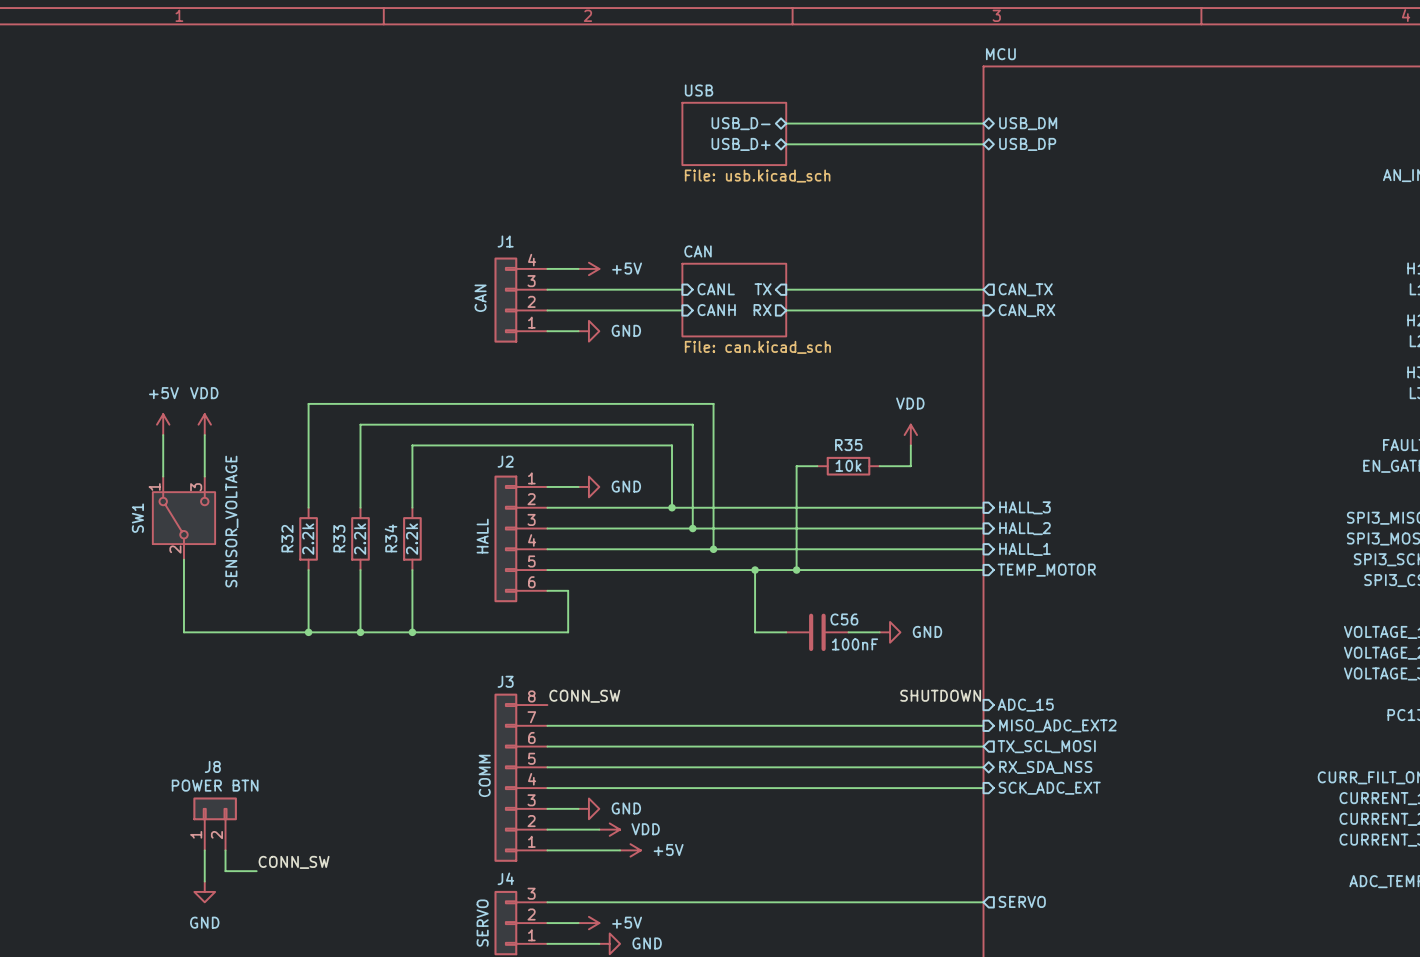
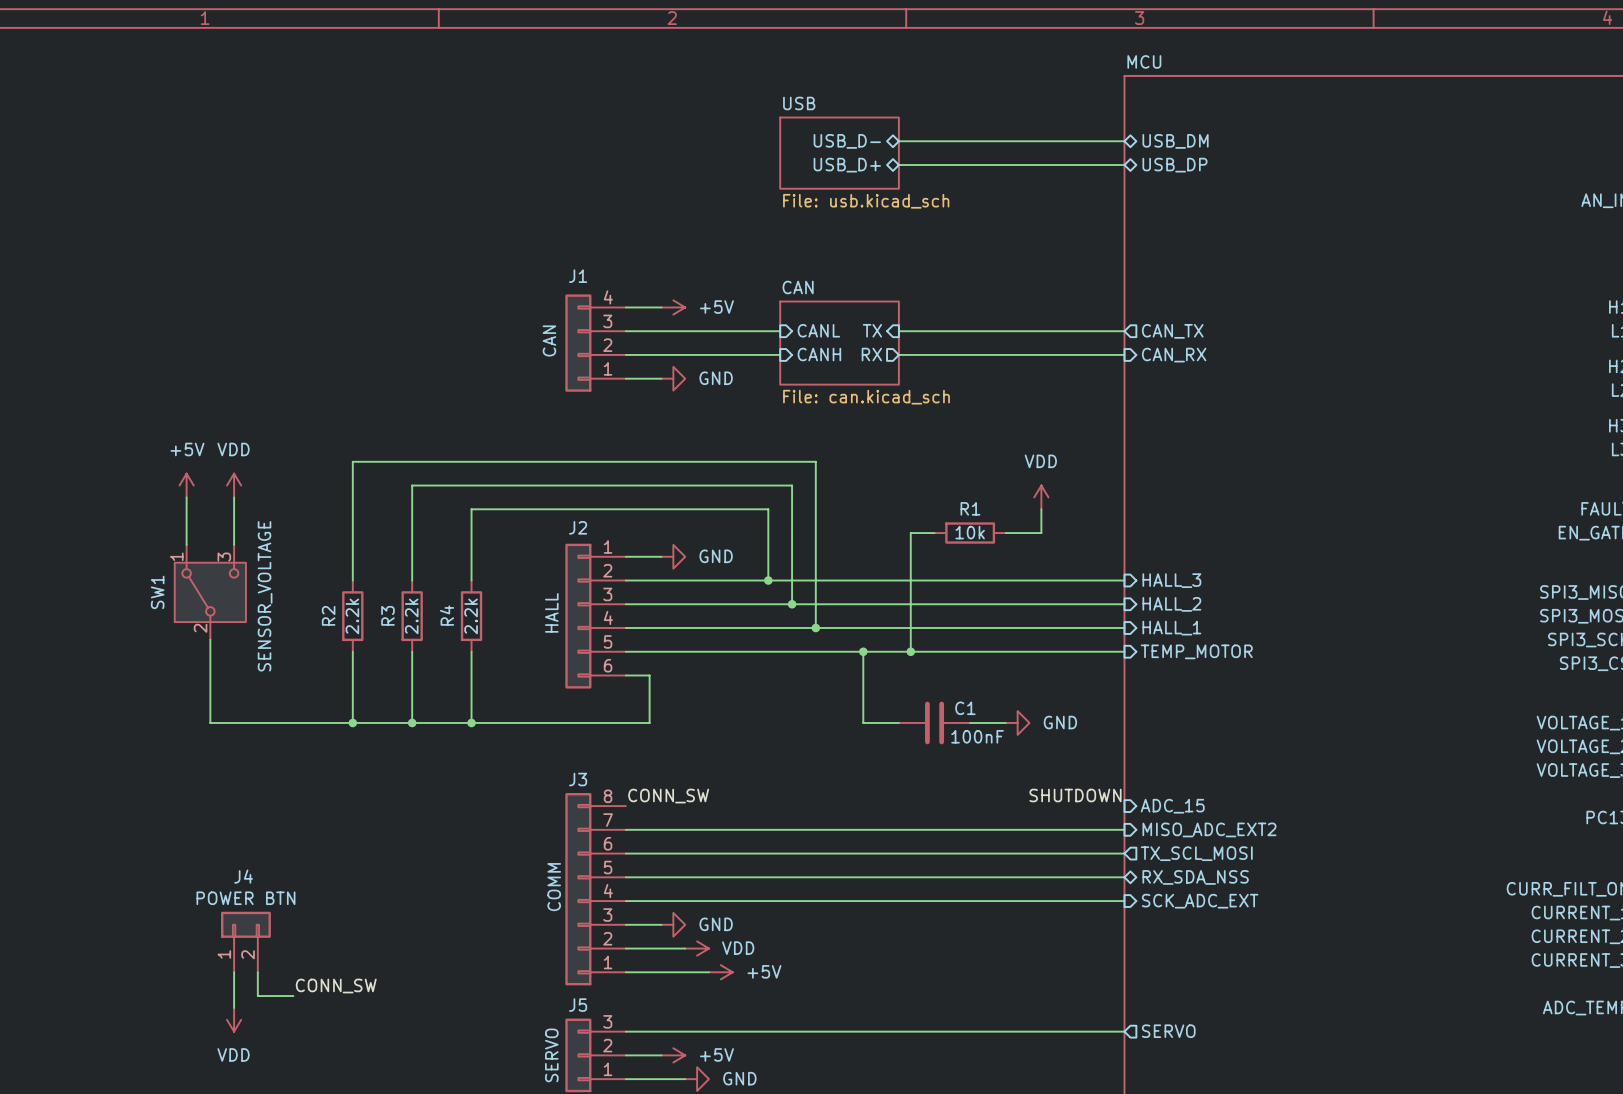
R35 name: R35 (848, 445) -> R1 (970, 508)
R32 name: R32 (287, 538) -> R2 (328, 615)
R33 name: R33 (339, 538) -> R3 (387, 615)
R34 name: R34 (391, 538) -> R4 (447, 615)
C56 name: C56 (844, 619) -> C1 (965, 708)
J8 name: J8 (212, 766) -> J4 (243, 876)
J4 name: J4 (505, 878) -> J5 (578, 1005)
power symbol: GND (204, 891) -> VDD (234, 1019)

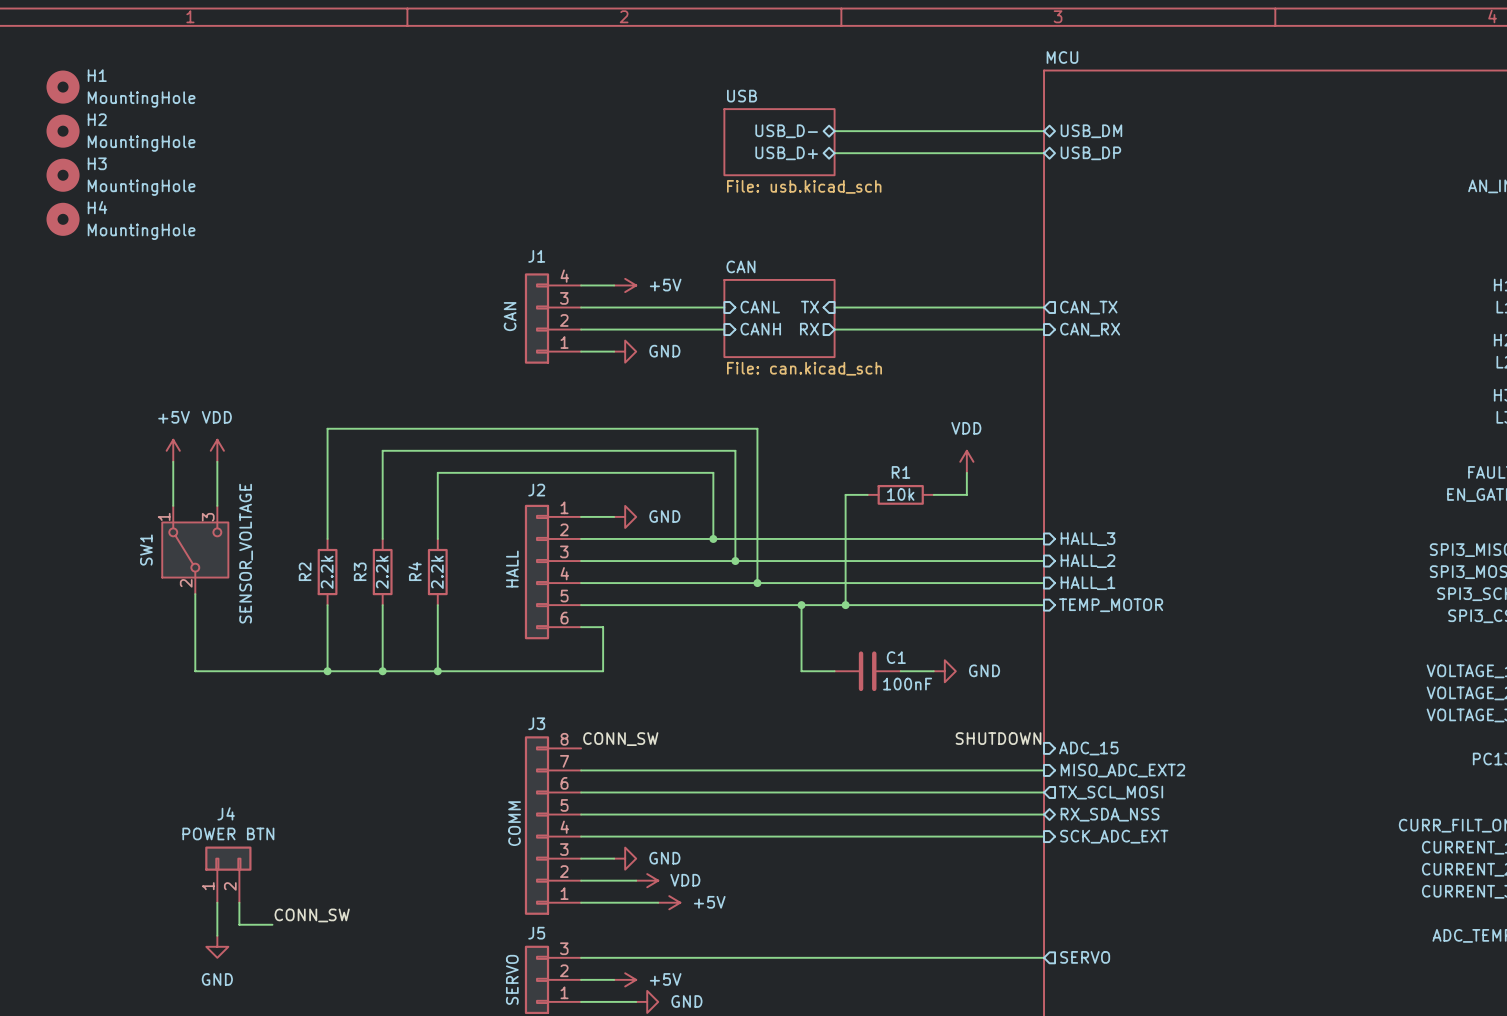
H1: none -> MountingHole (63, 87)
H2: none -> MountingHole (63, 131)
H3: none -> MountingHole (63, 175)
H4: none -> MountingHole (63, 219)
power symbol: VDD (234, 1019) -> GND (217, 946)

